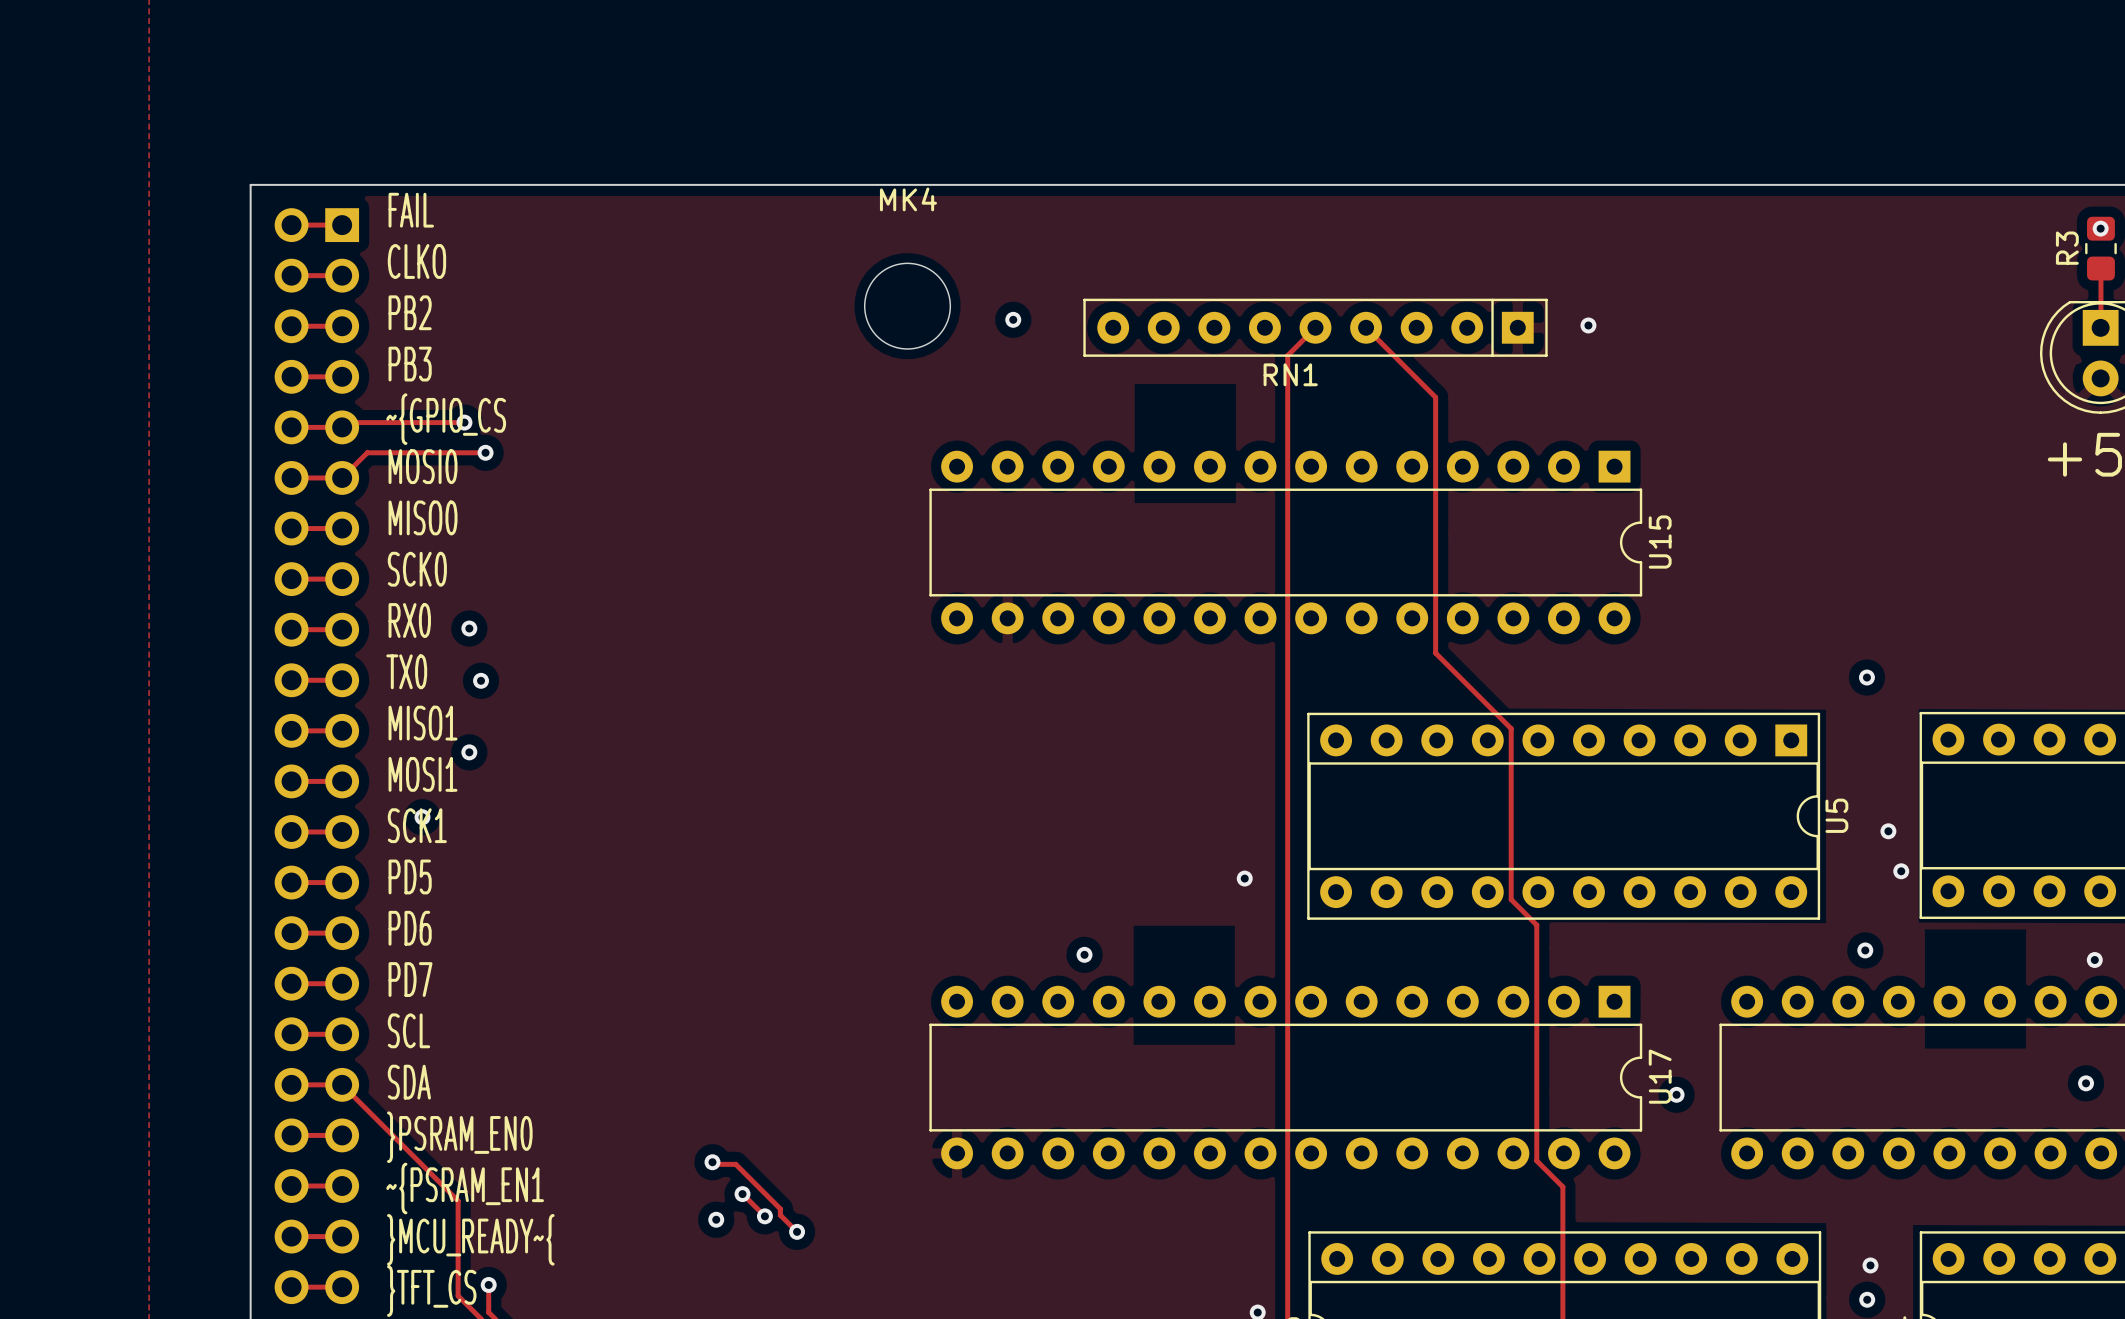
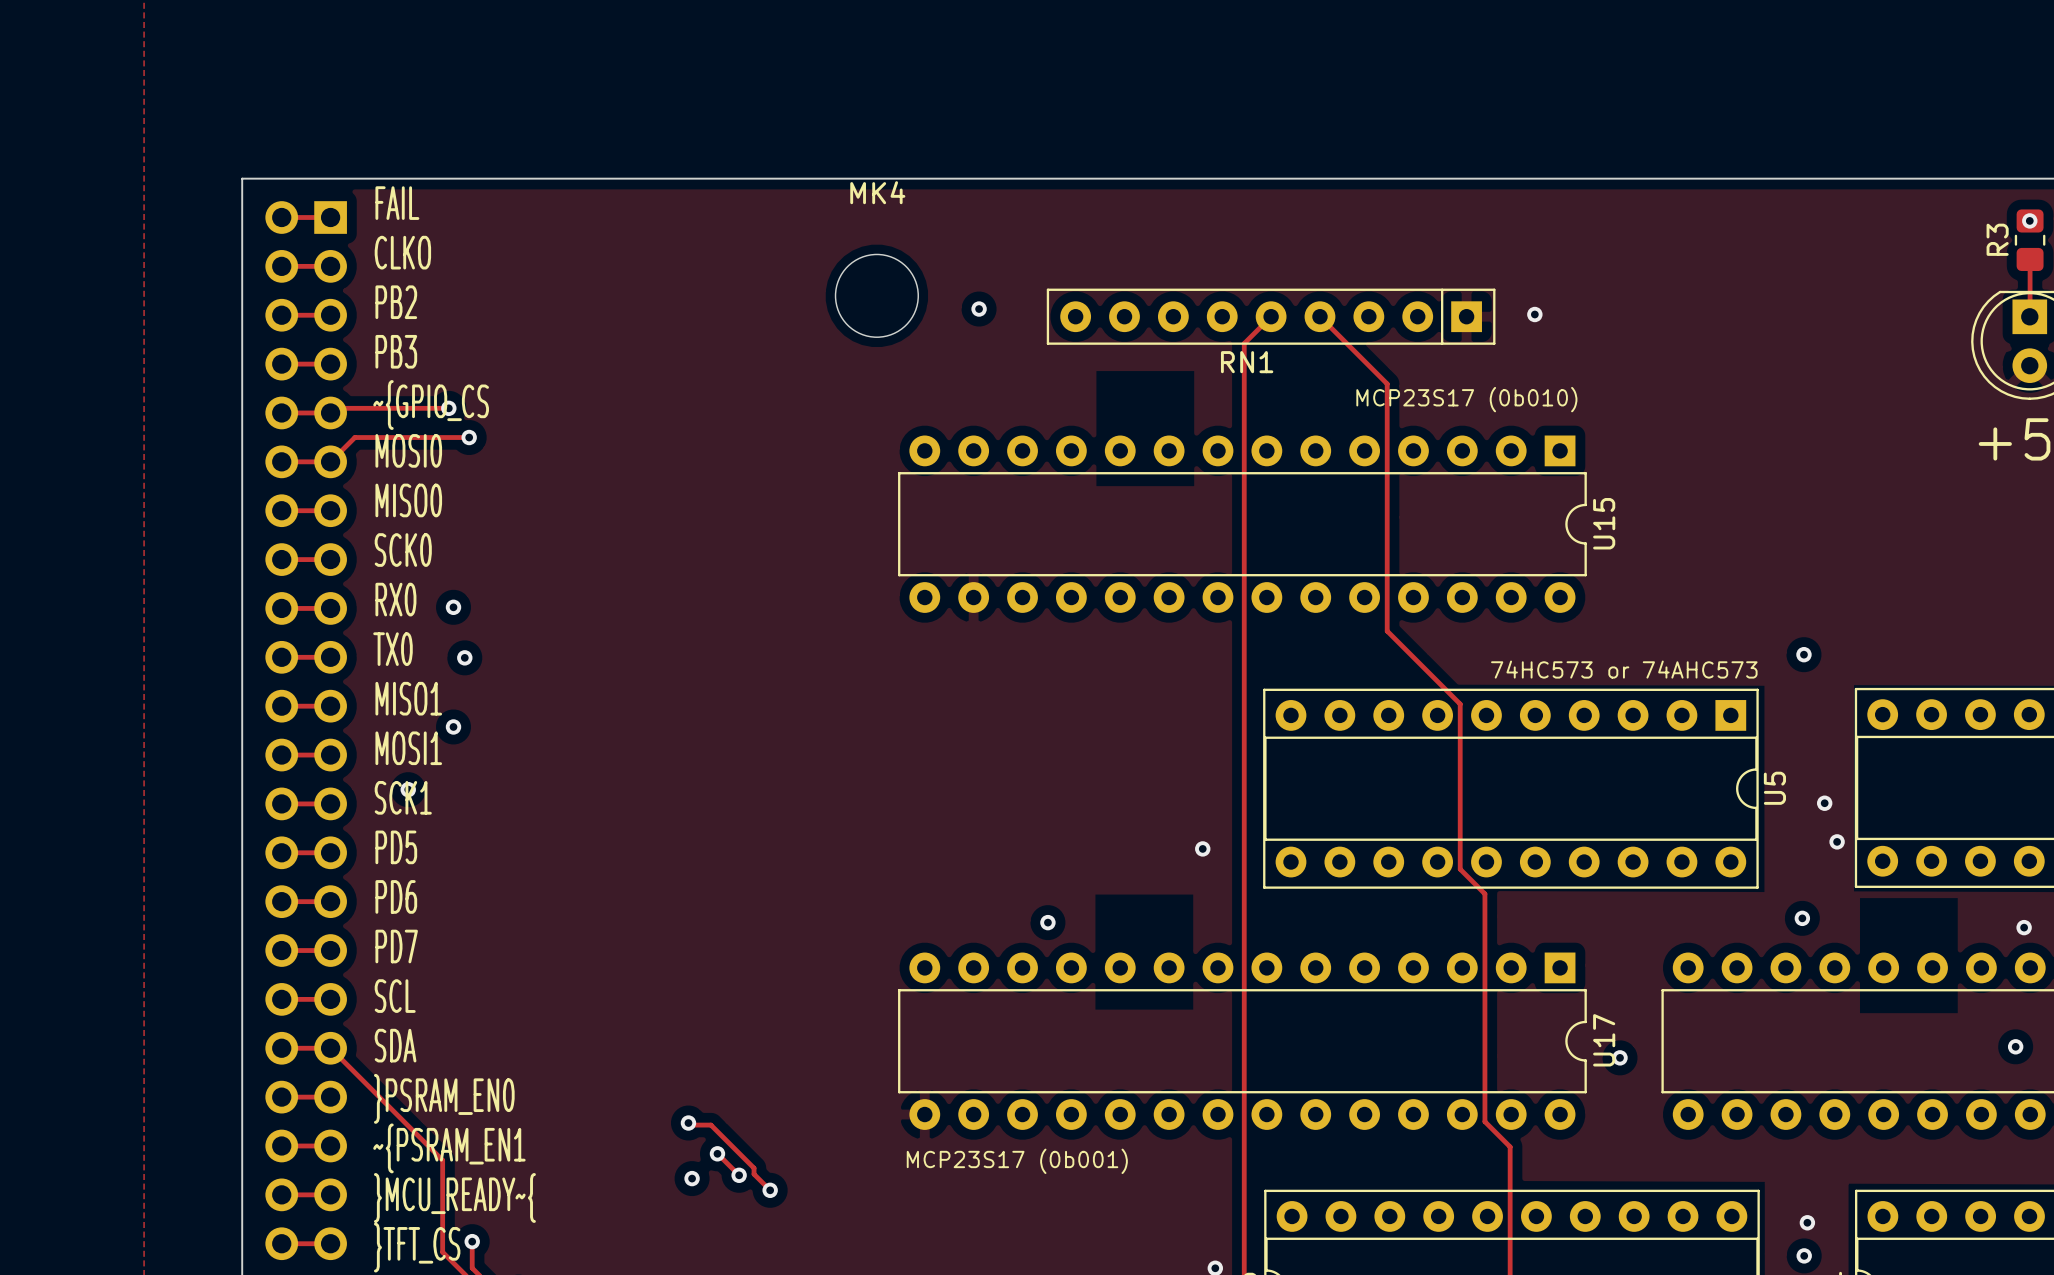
text: none -> MCP23S17 (0b010) (1466, 399)
text: none -> 74HC573 or 74AHC573 (1624, 669)
text: none -> MCP23S17 (0b001) (1017, 1161)

